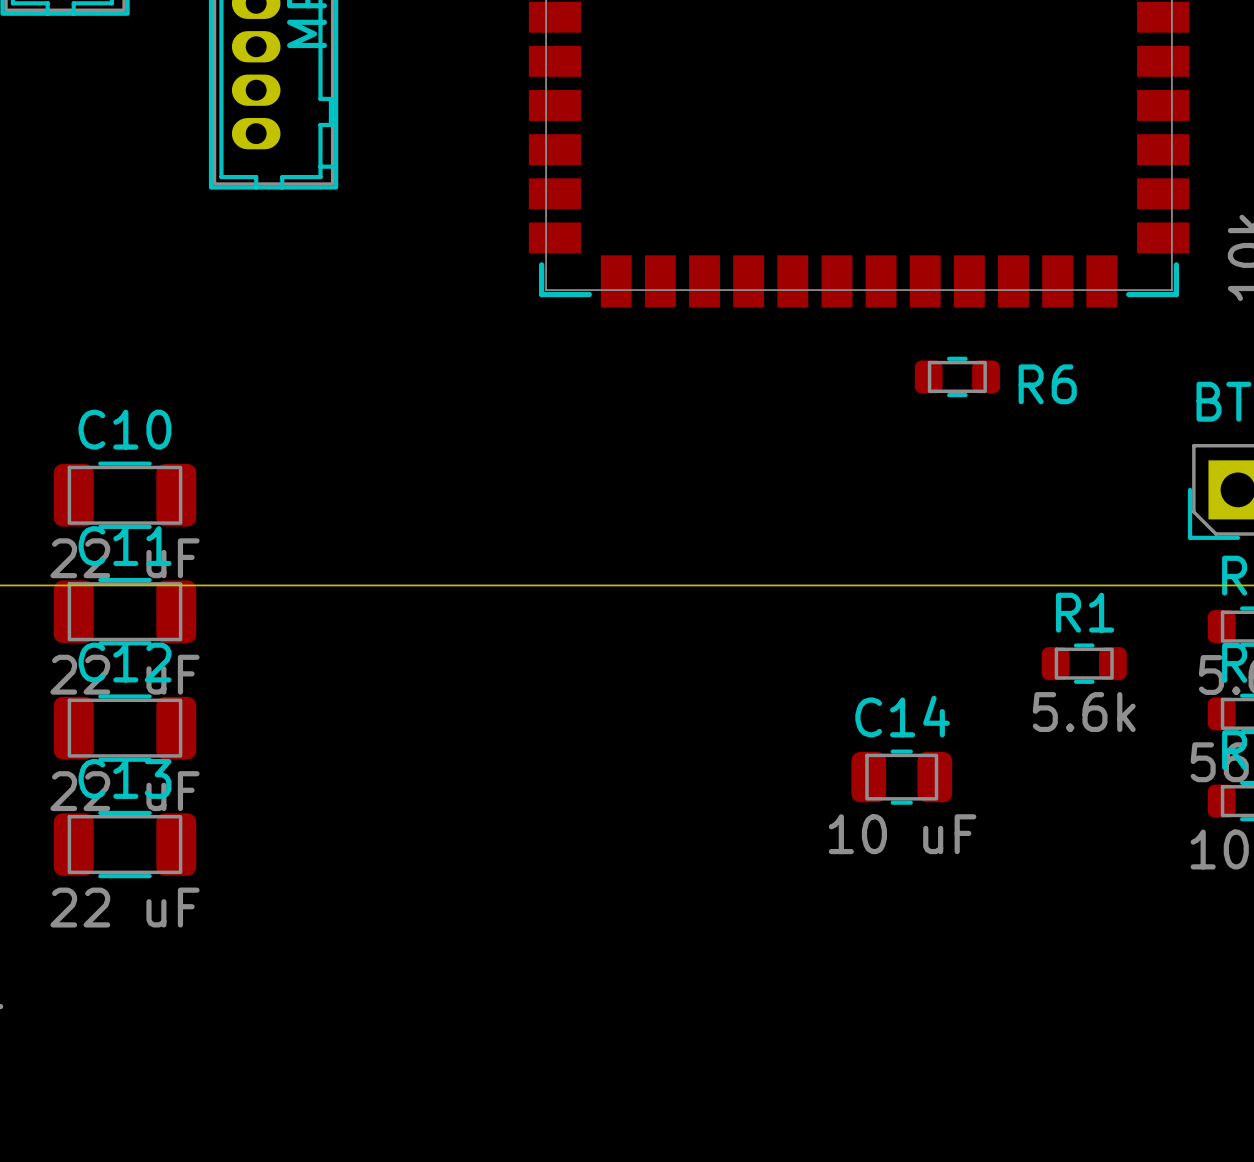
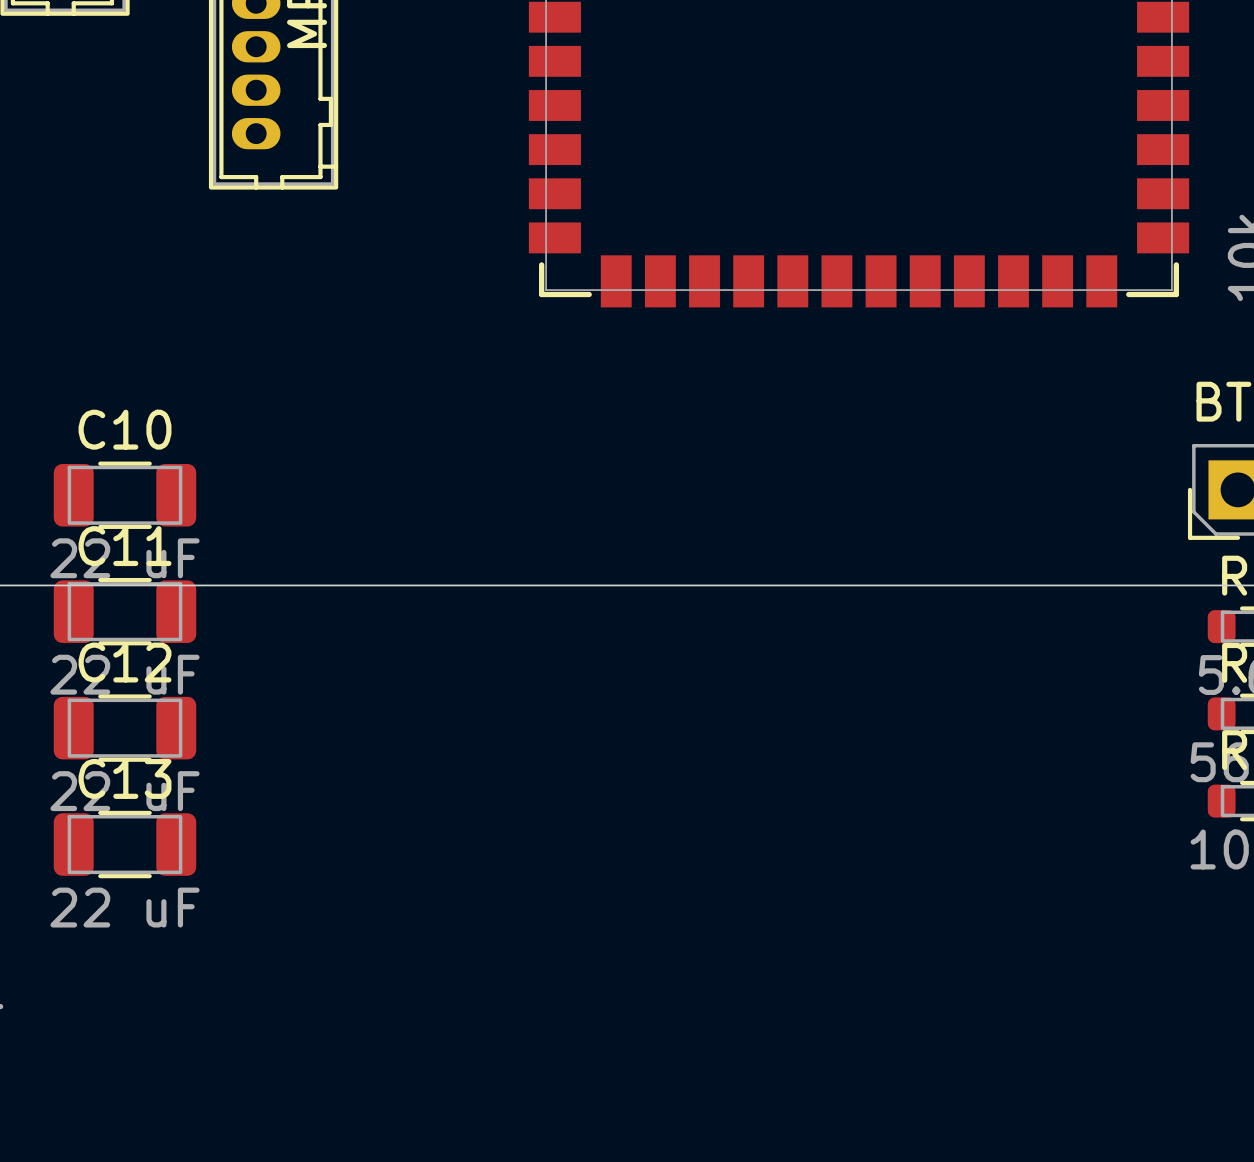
R6: (957, 376) -> none
R1: 5.6k (1084, 663) -> none
C14: 10 uF (901, 777) -> none

